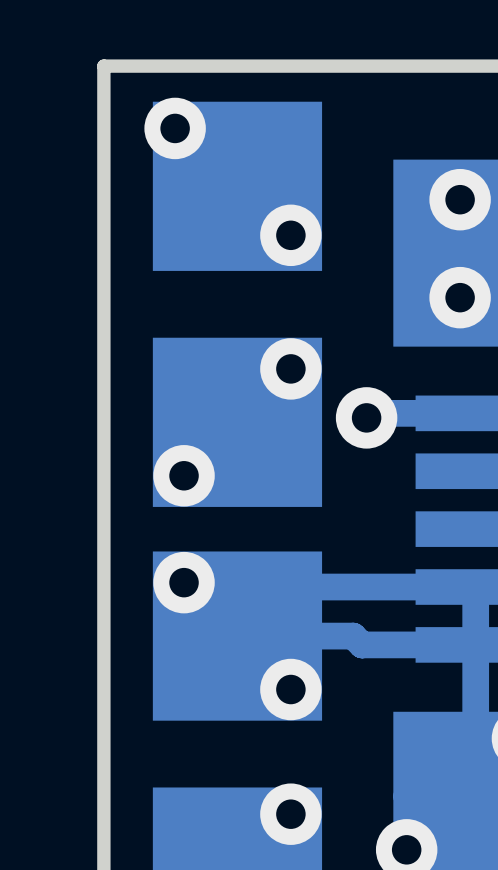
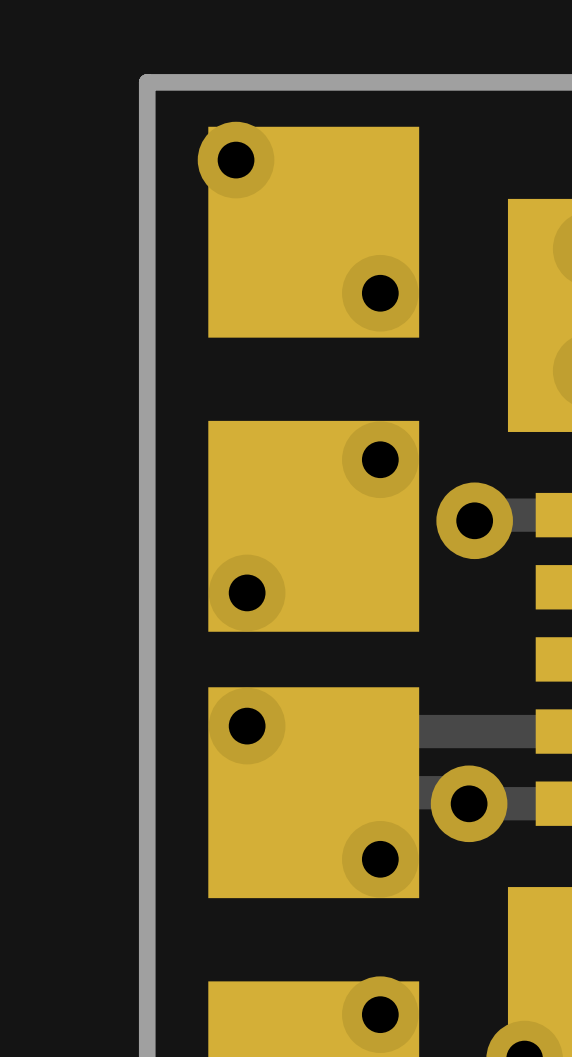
via: none -> (469, 803)

